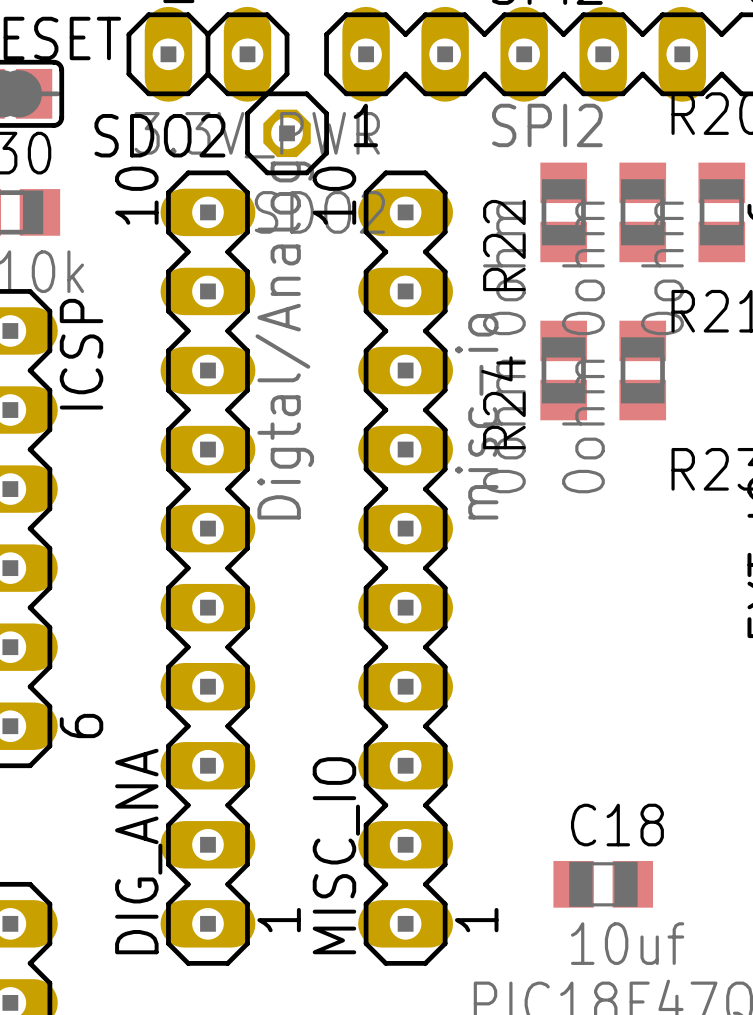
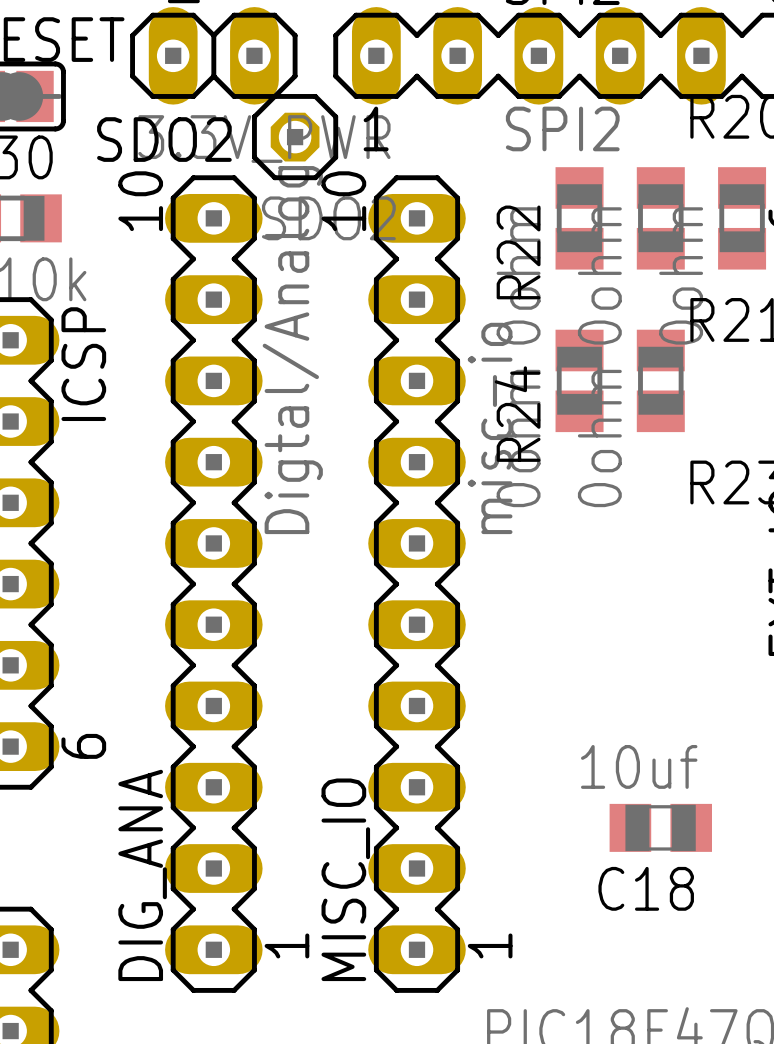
C18 name position: C18 (617, 825) -> C18 (646, 888)
C18 position: (603, 884) -> (660, 827)
C18 value position: 10uf (627, 943) -> 10uf (639, 766)

